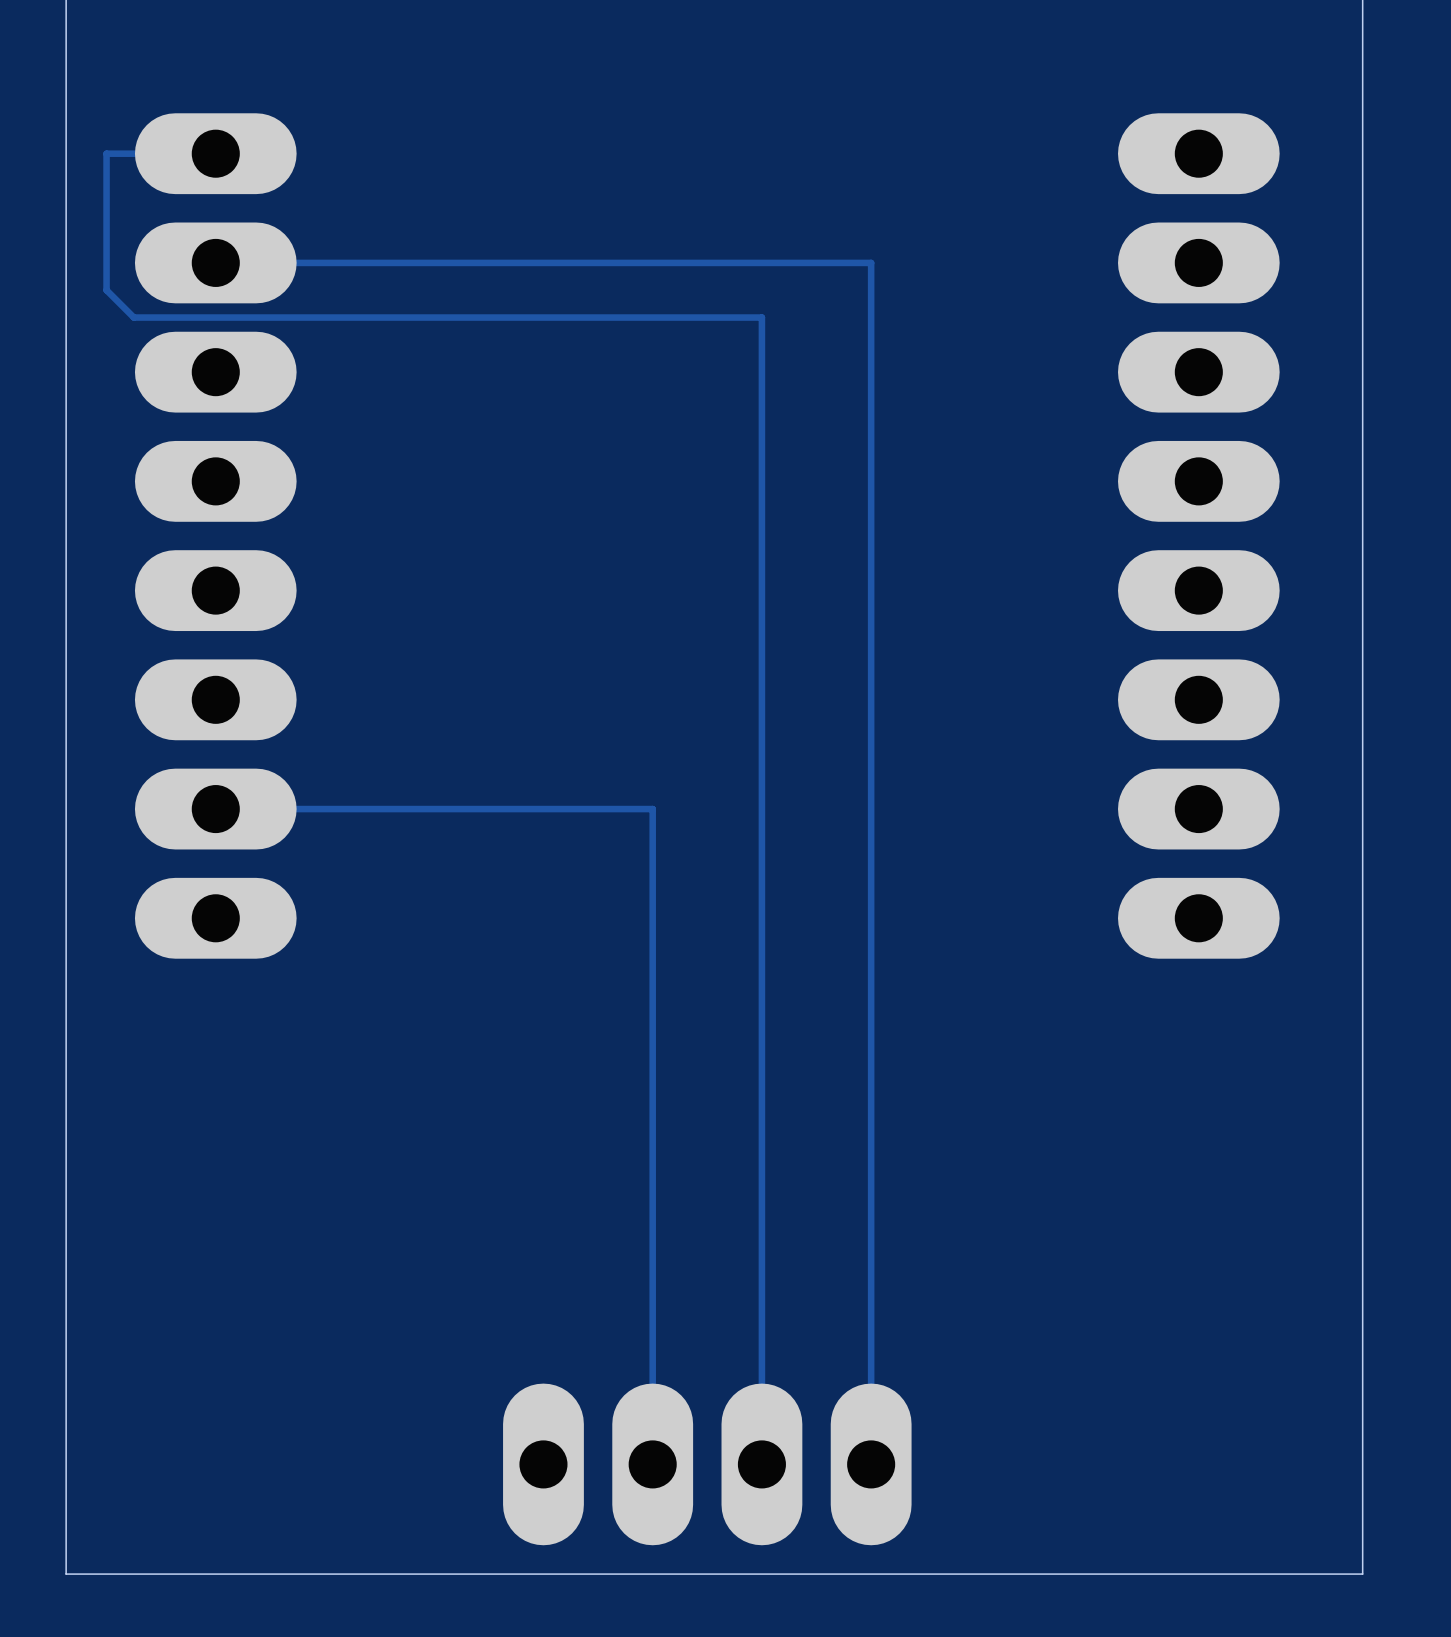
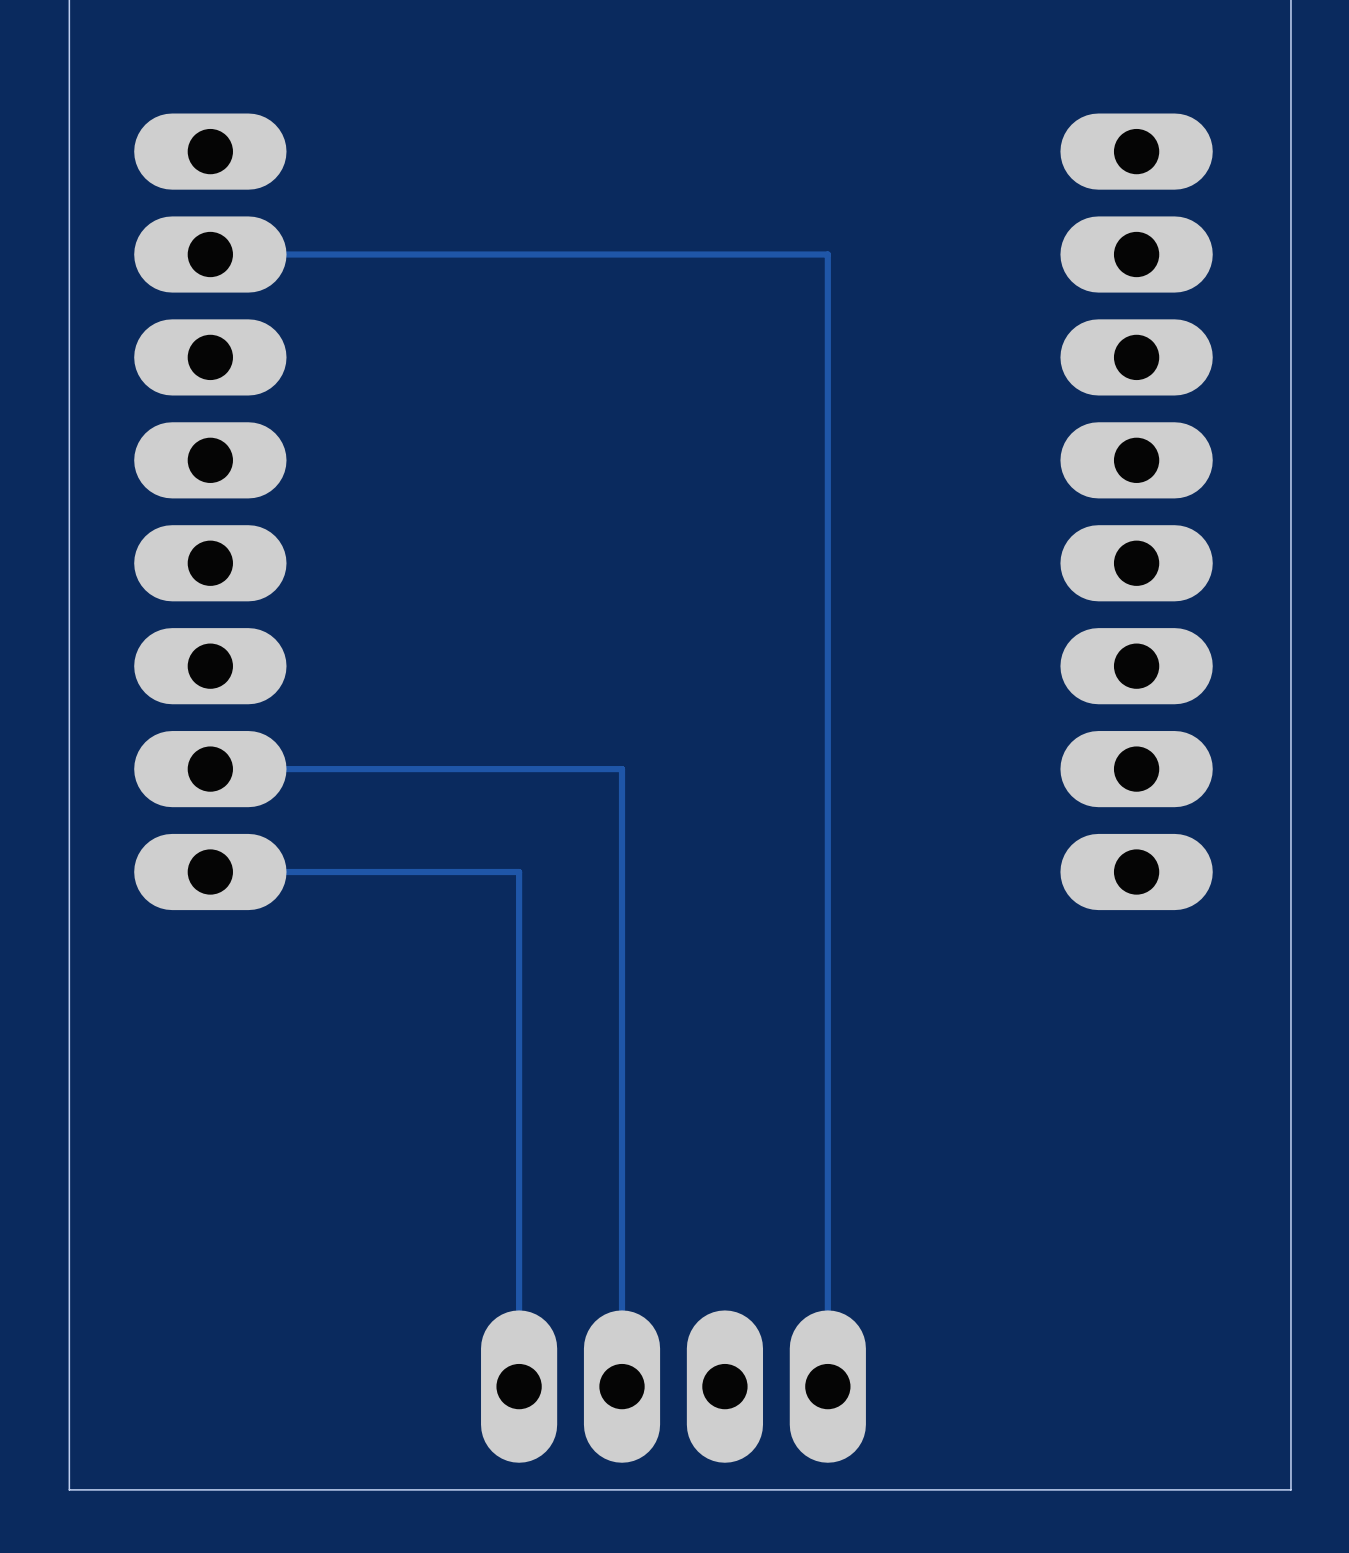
track: (215, 153) (106, 153) (106, 290) (133, 317) (761, 317) (761, 1464) -> none
track: none -> (210, 872) (519, 872) (519, 1386)

